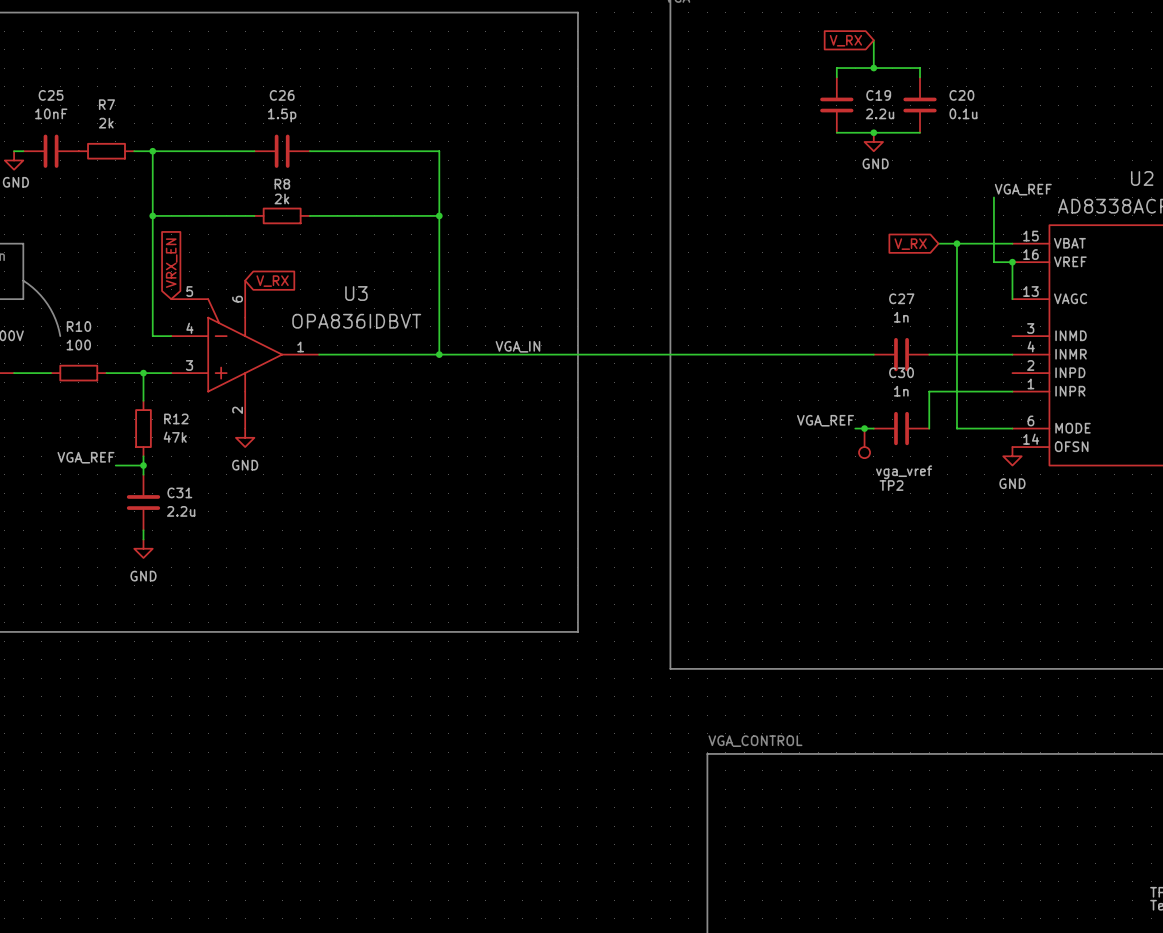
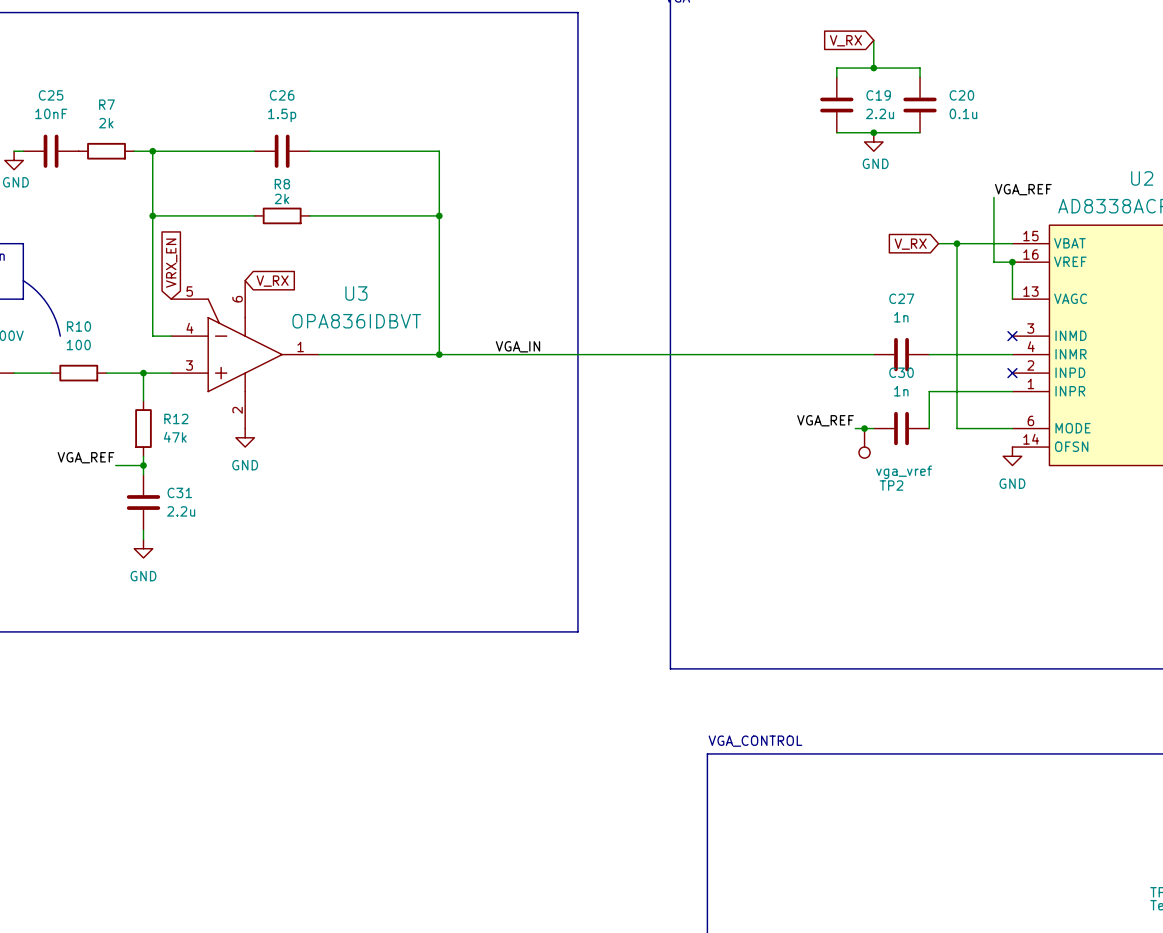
no-connect mark: none -> (1012, 336)
no-connect mark: none -> (1012, 373)

